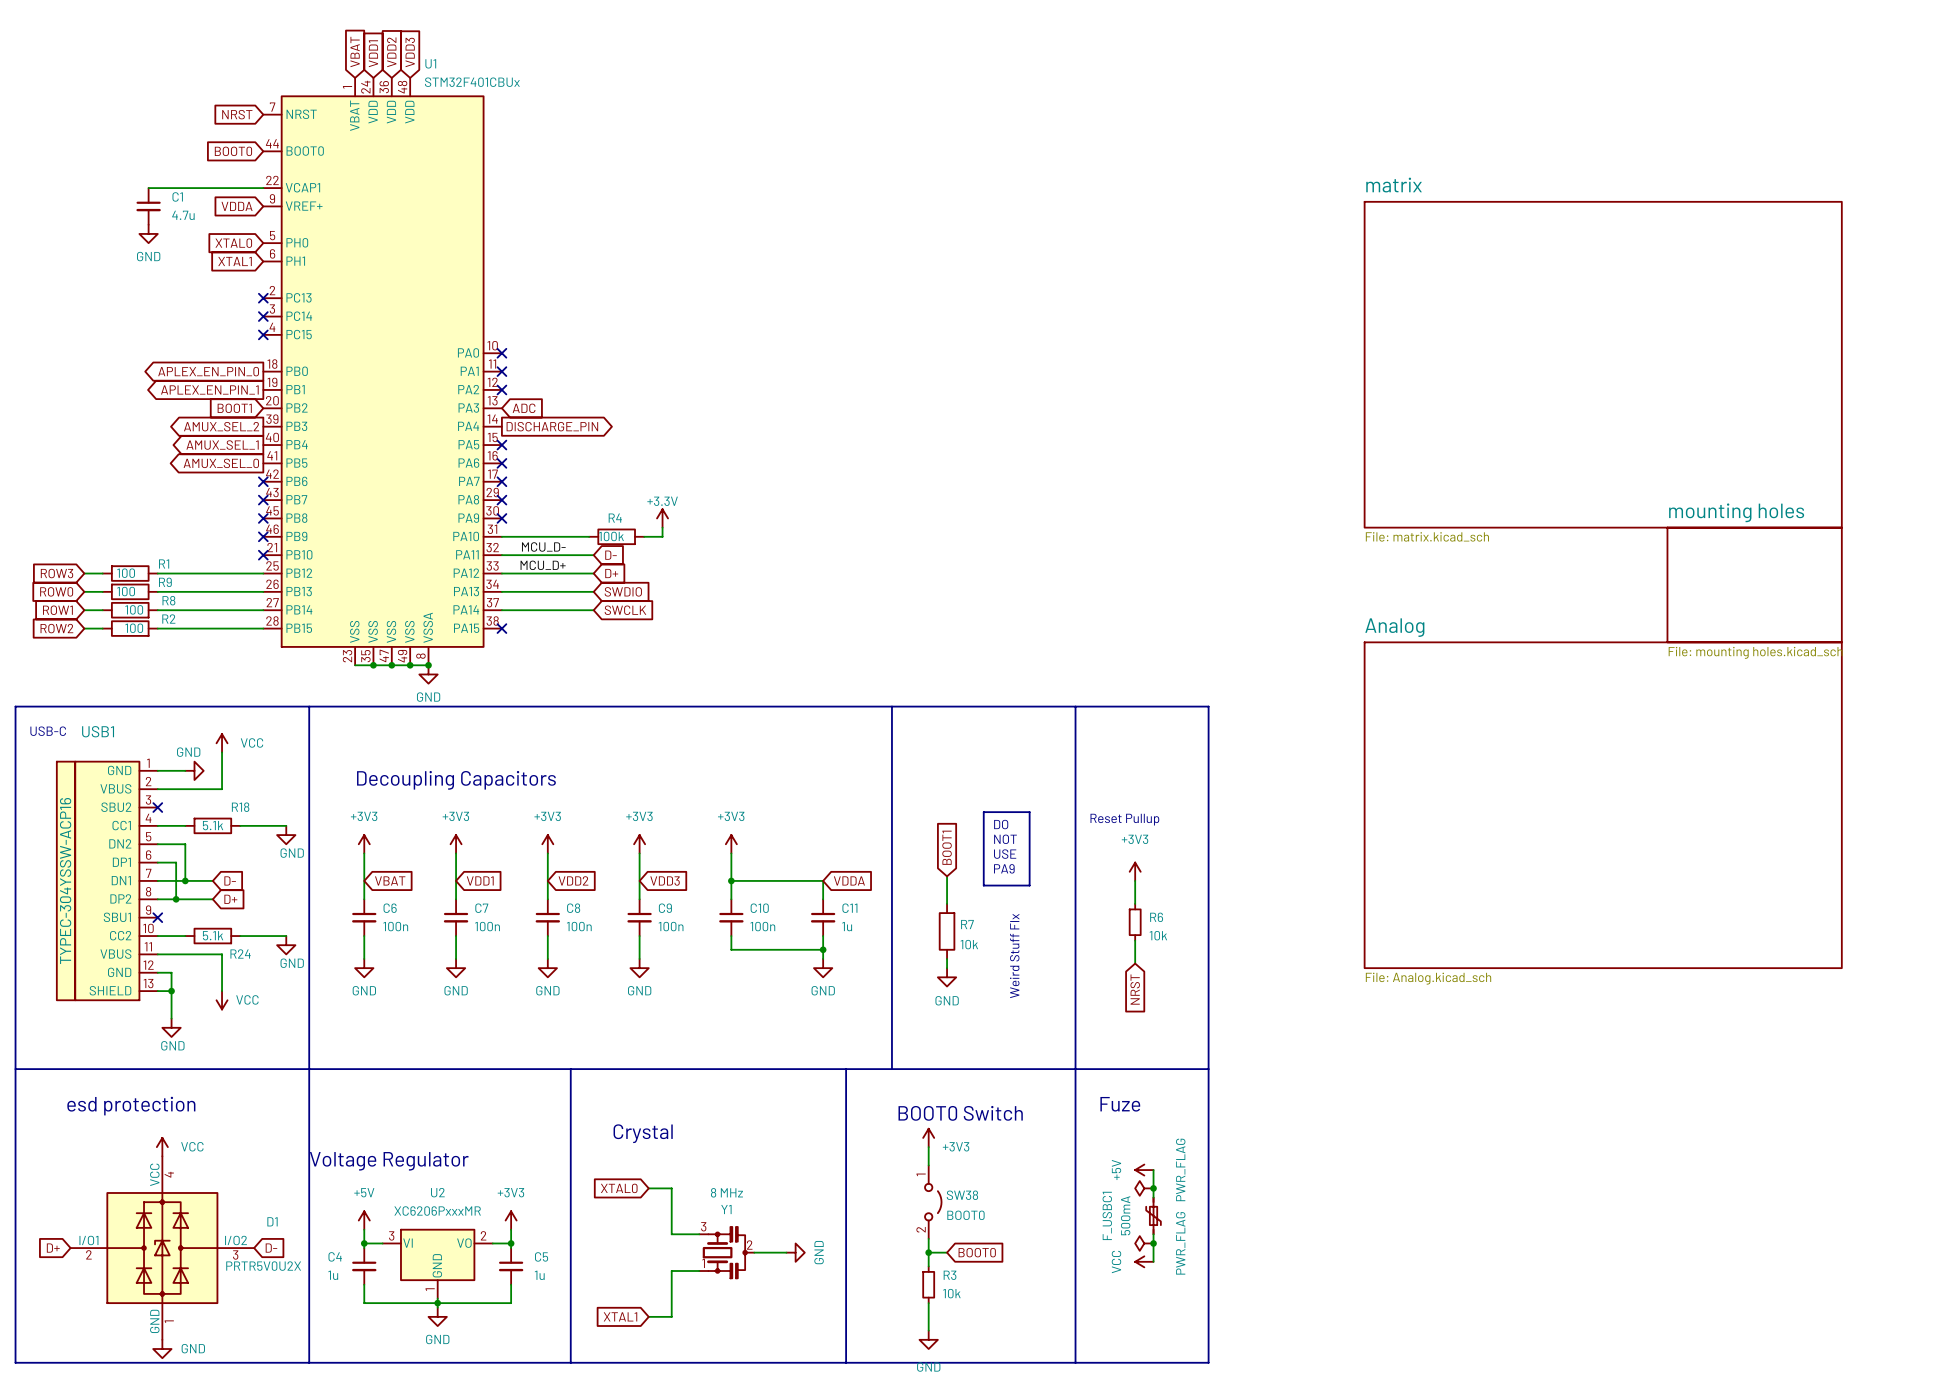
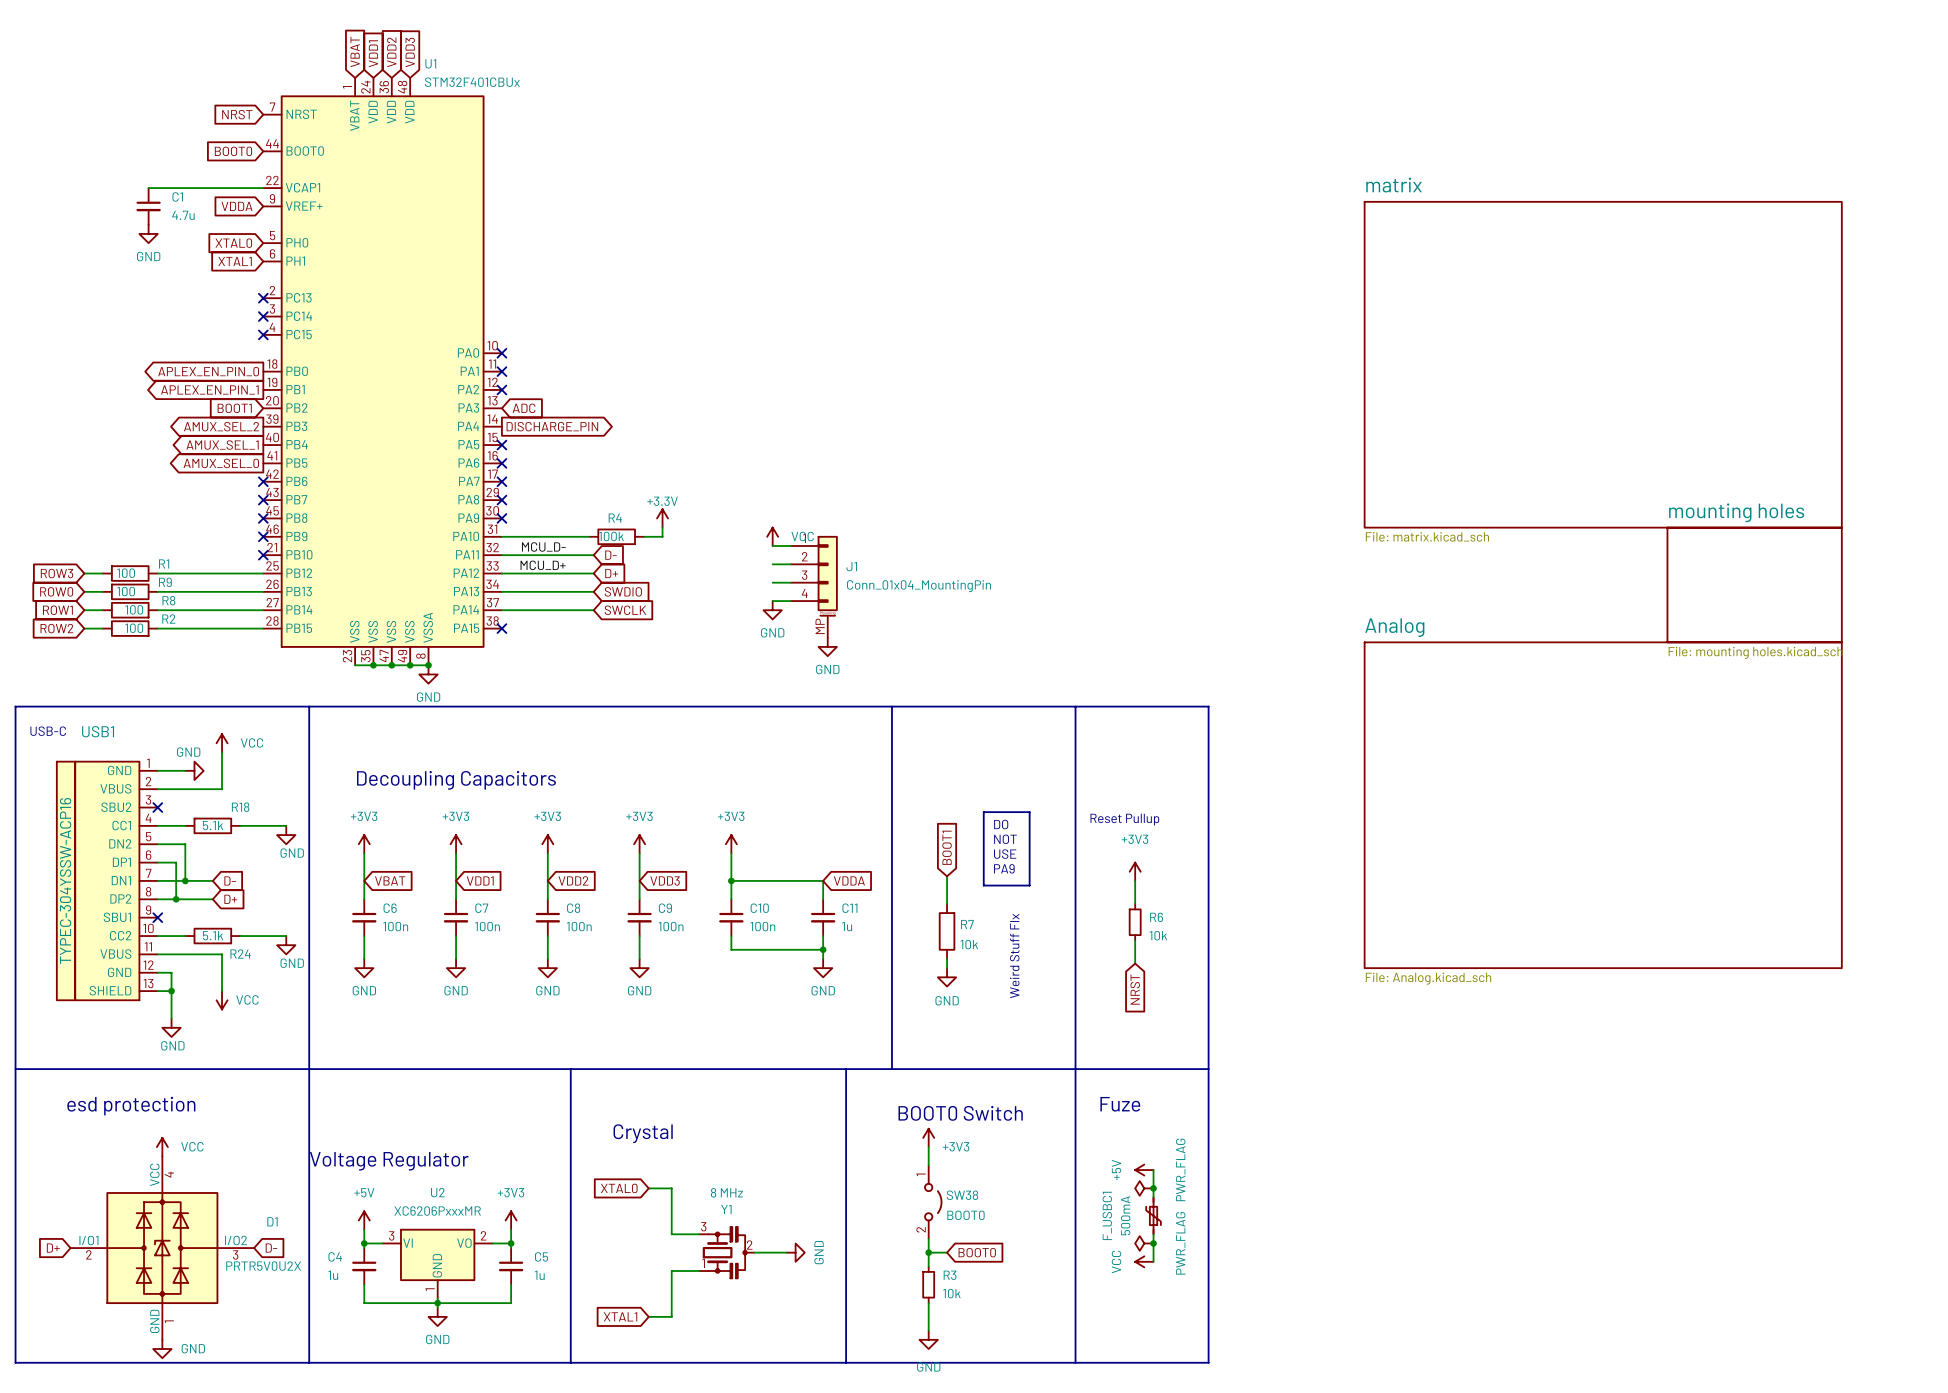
power symbol: none -> VCC (772, 536)
wire: none -> (772, 545) (791, 545)
wire: none -> (772, 564) (791, 564)
wire: none -> (772, 582) (791, 582)
J1: none -> Conn_01x04_MountingPin (814, 586)
wire: none -> (772, 601) (791, 601)
power symbol: none -> GND (772, 610)
power symbol: none -> GND (827, 646)

